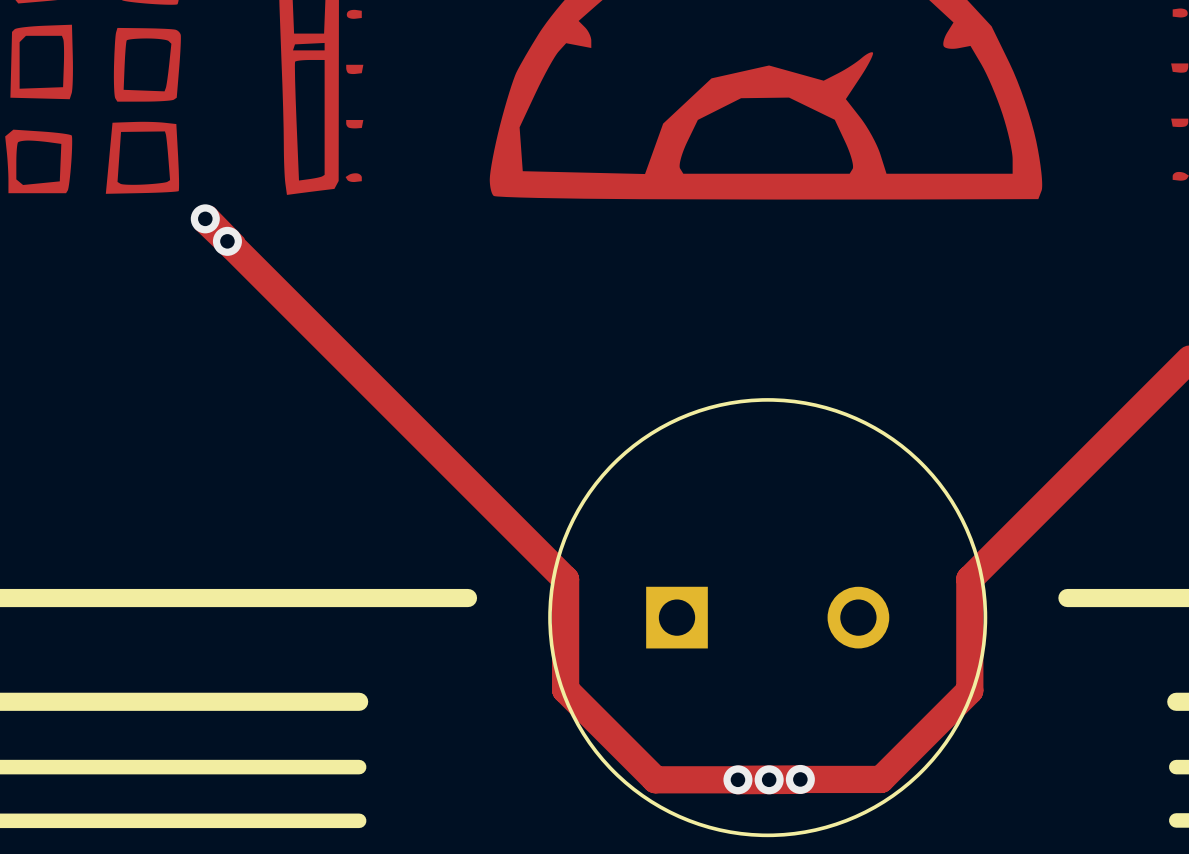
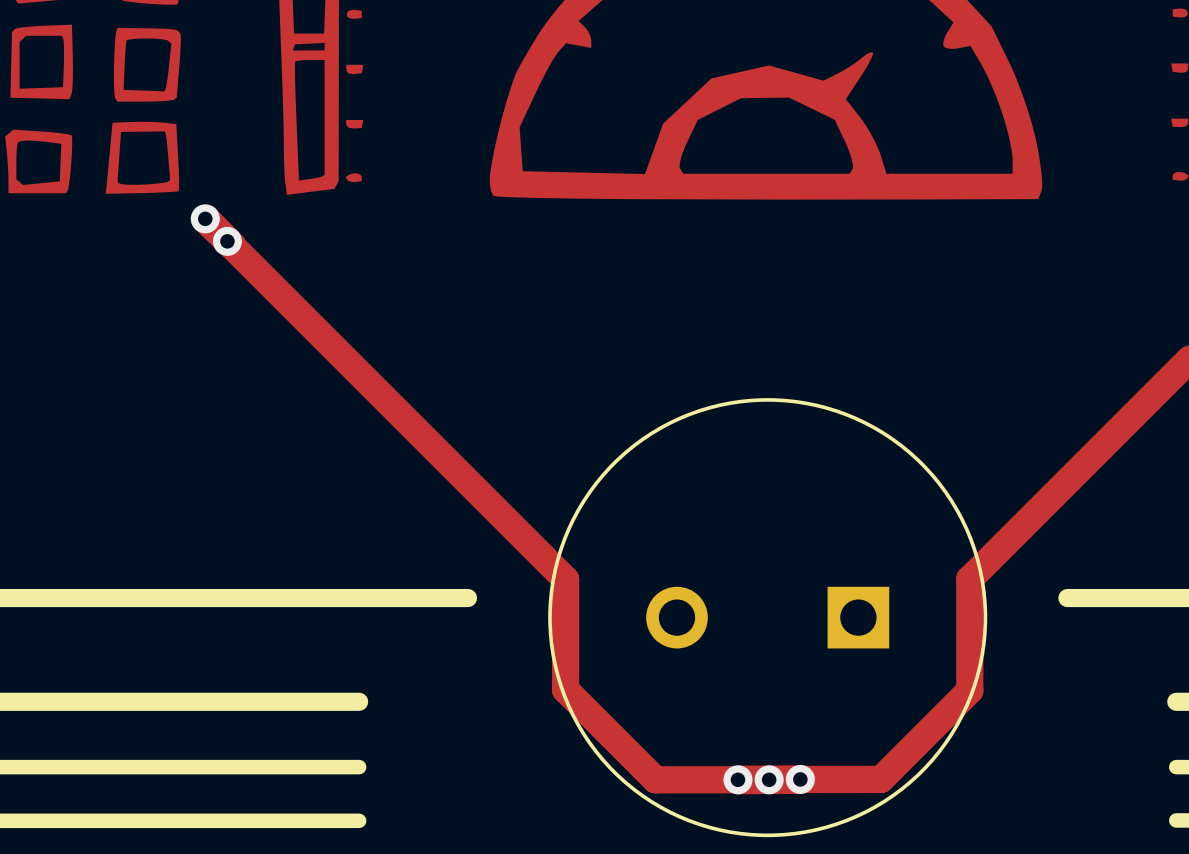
part rotation: 0° (767, 617) -> 180° (767, 617)

